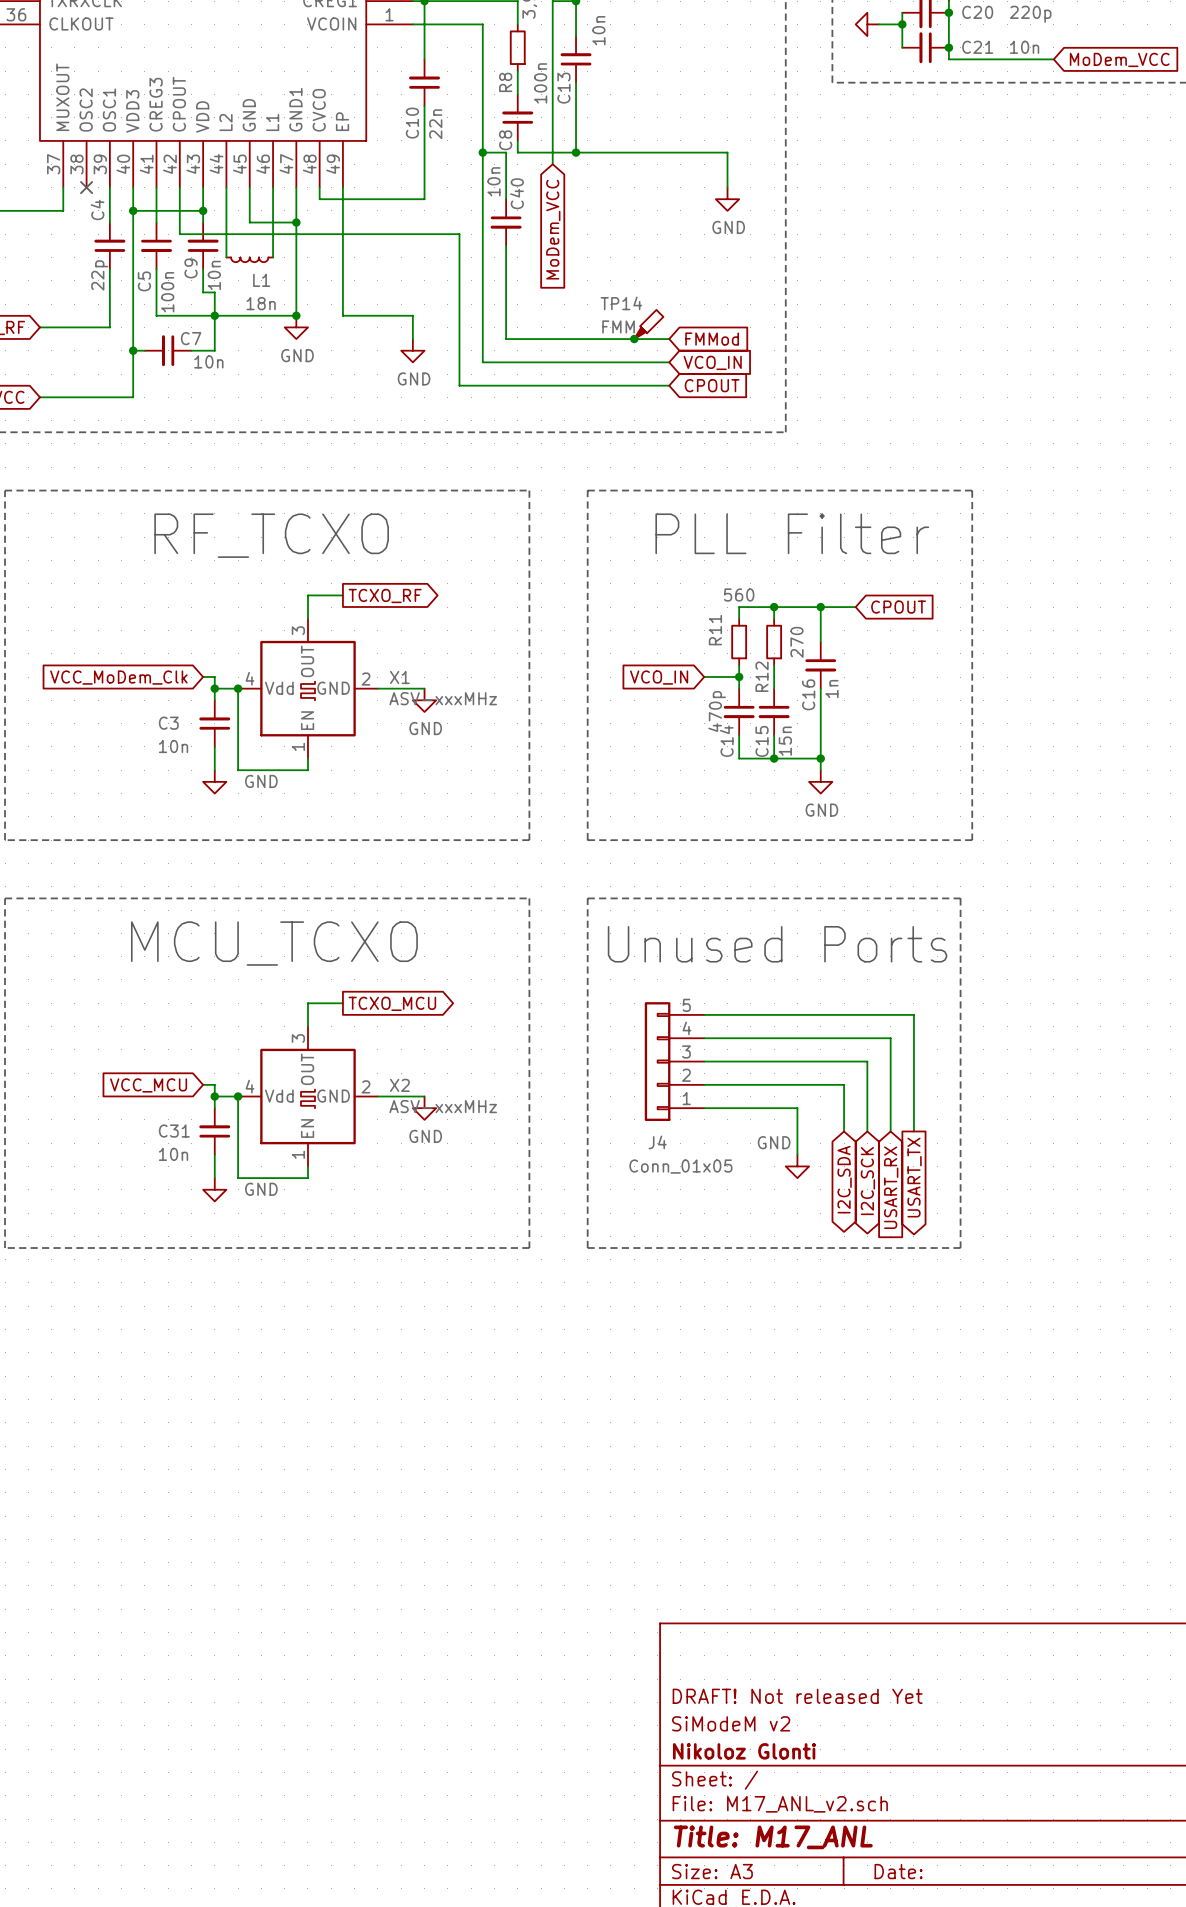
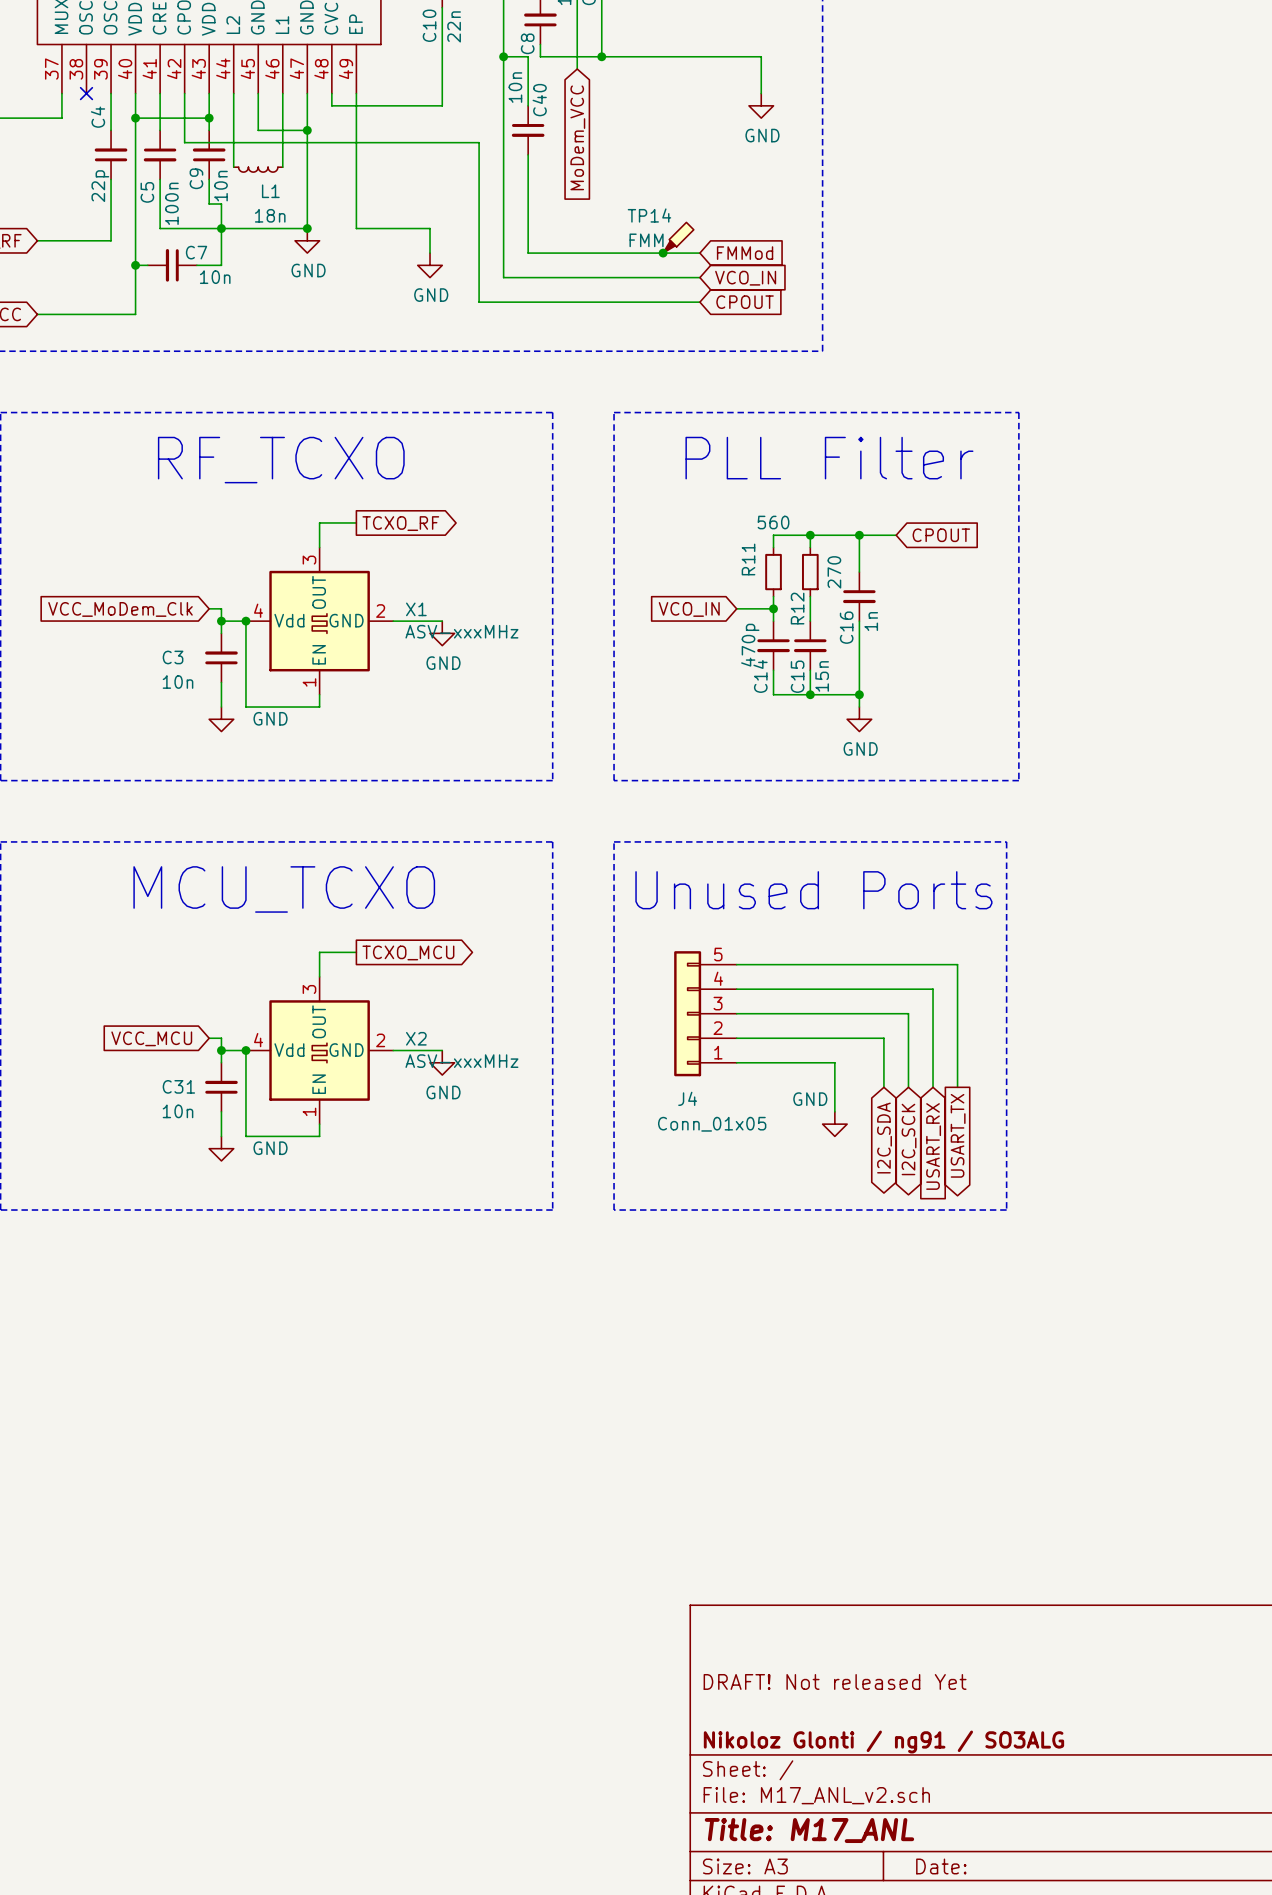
title block: SiModeM v2 (731, 1723) -> none
title block: Nikoloz Glonti (744, 1751) -> Nikoloz Glonti / ng91 / SO3ALG (883, 1742)

